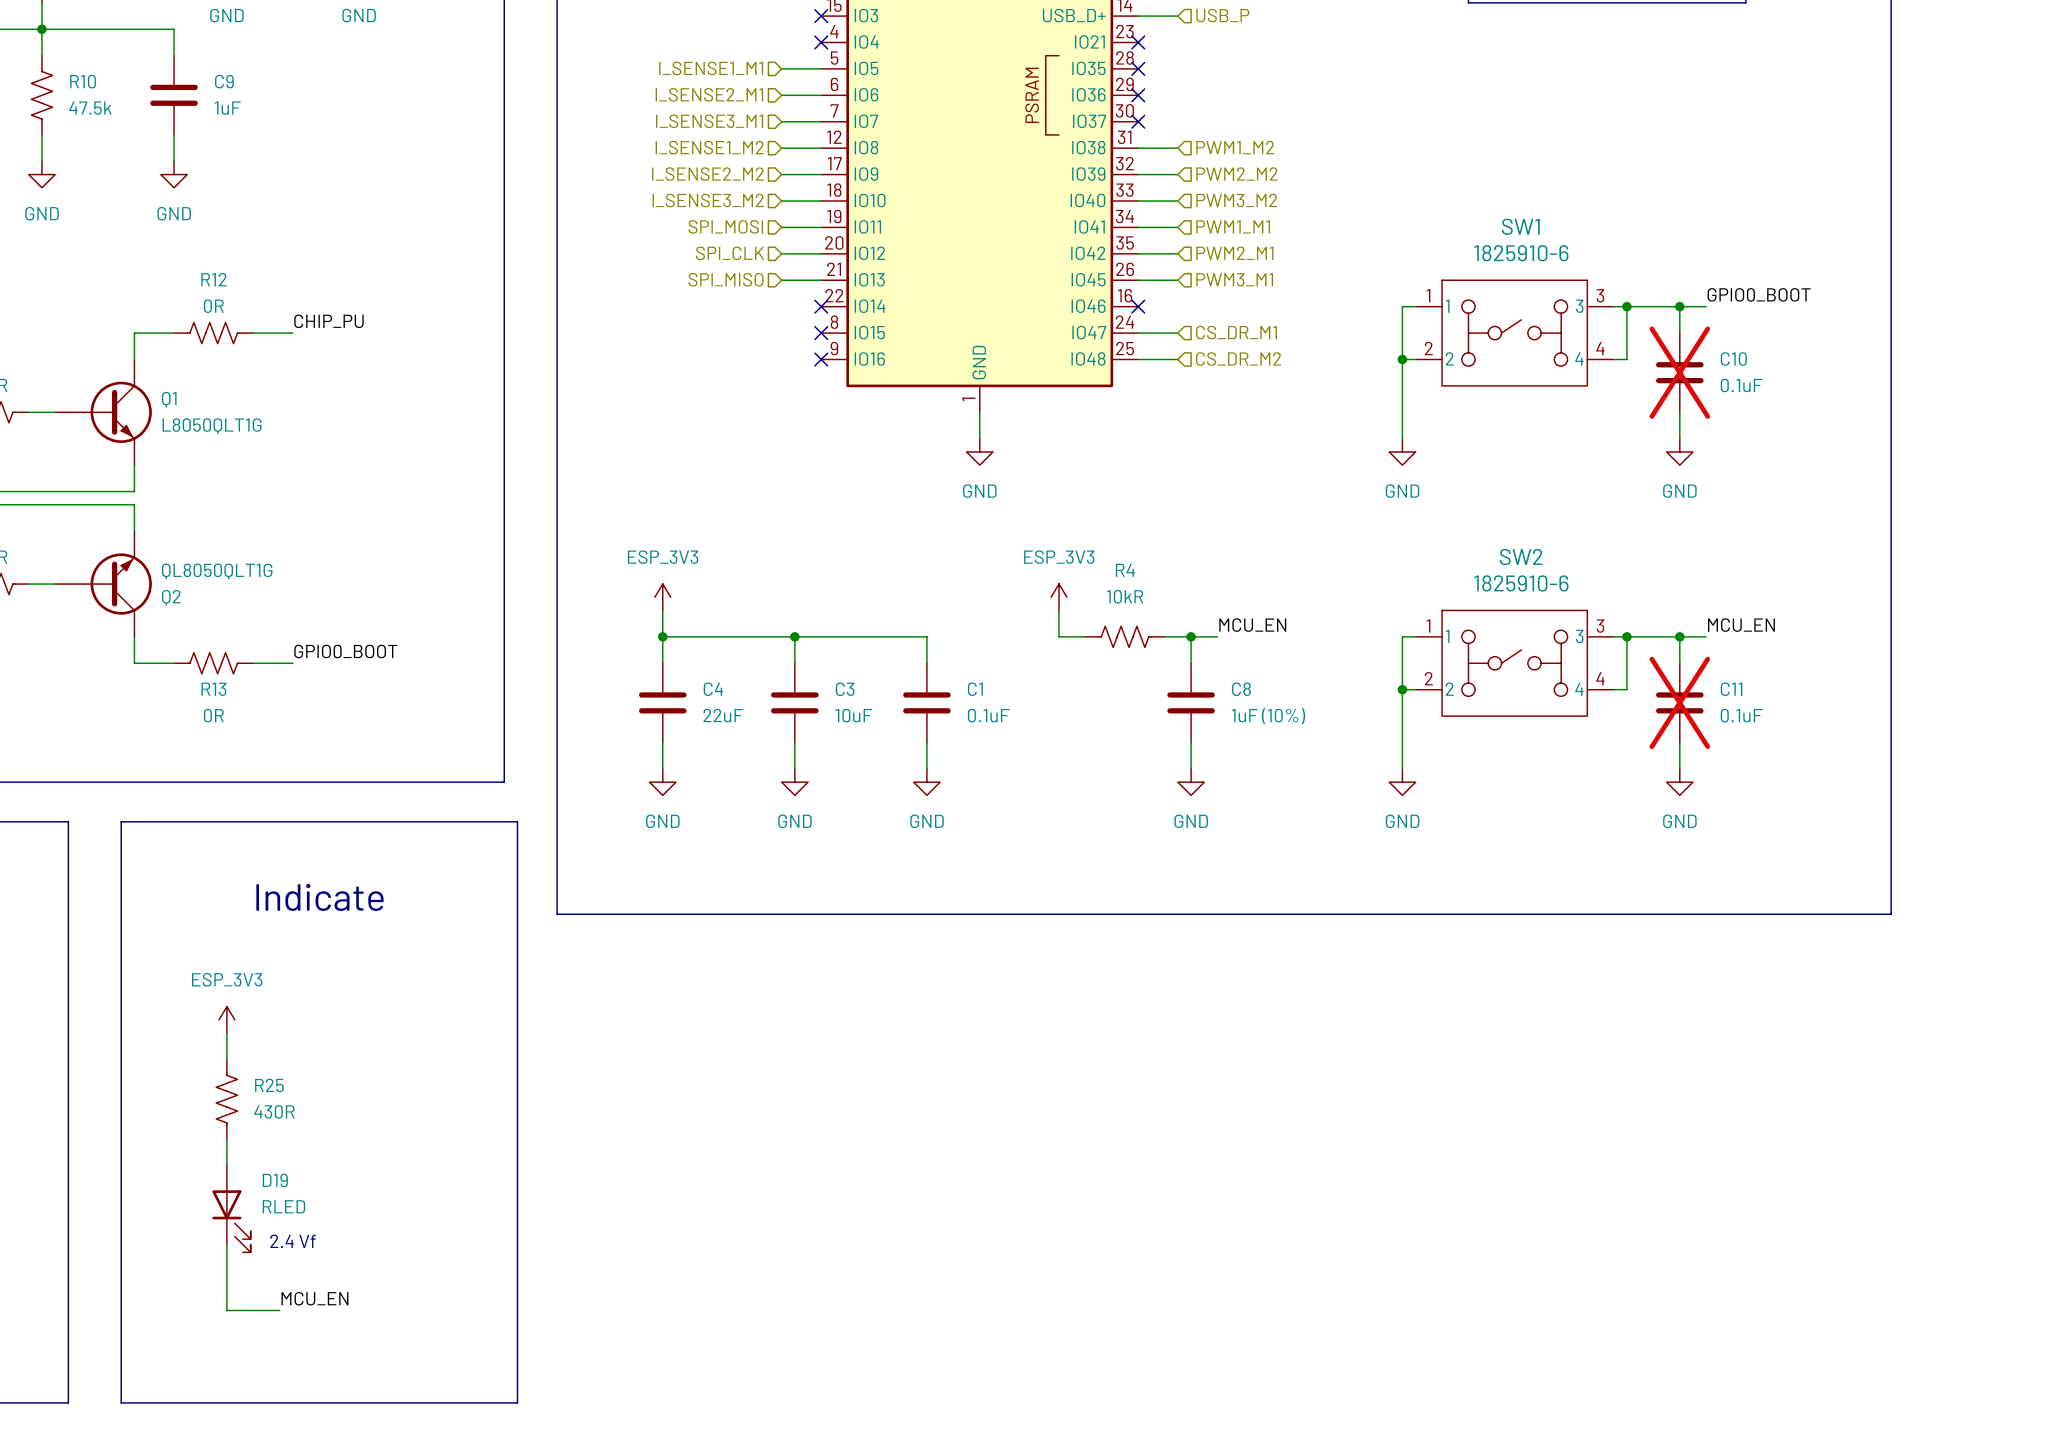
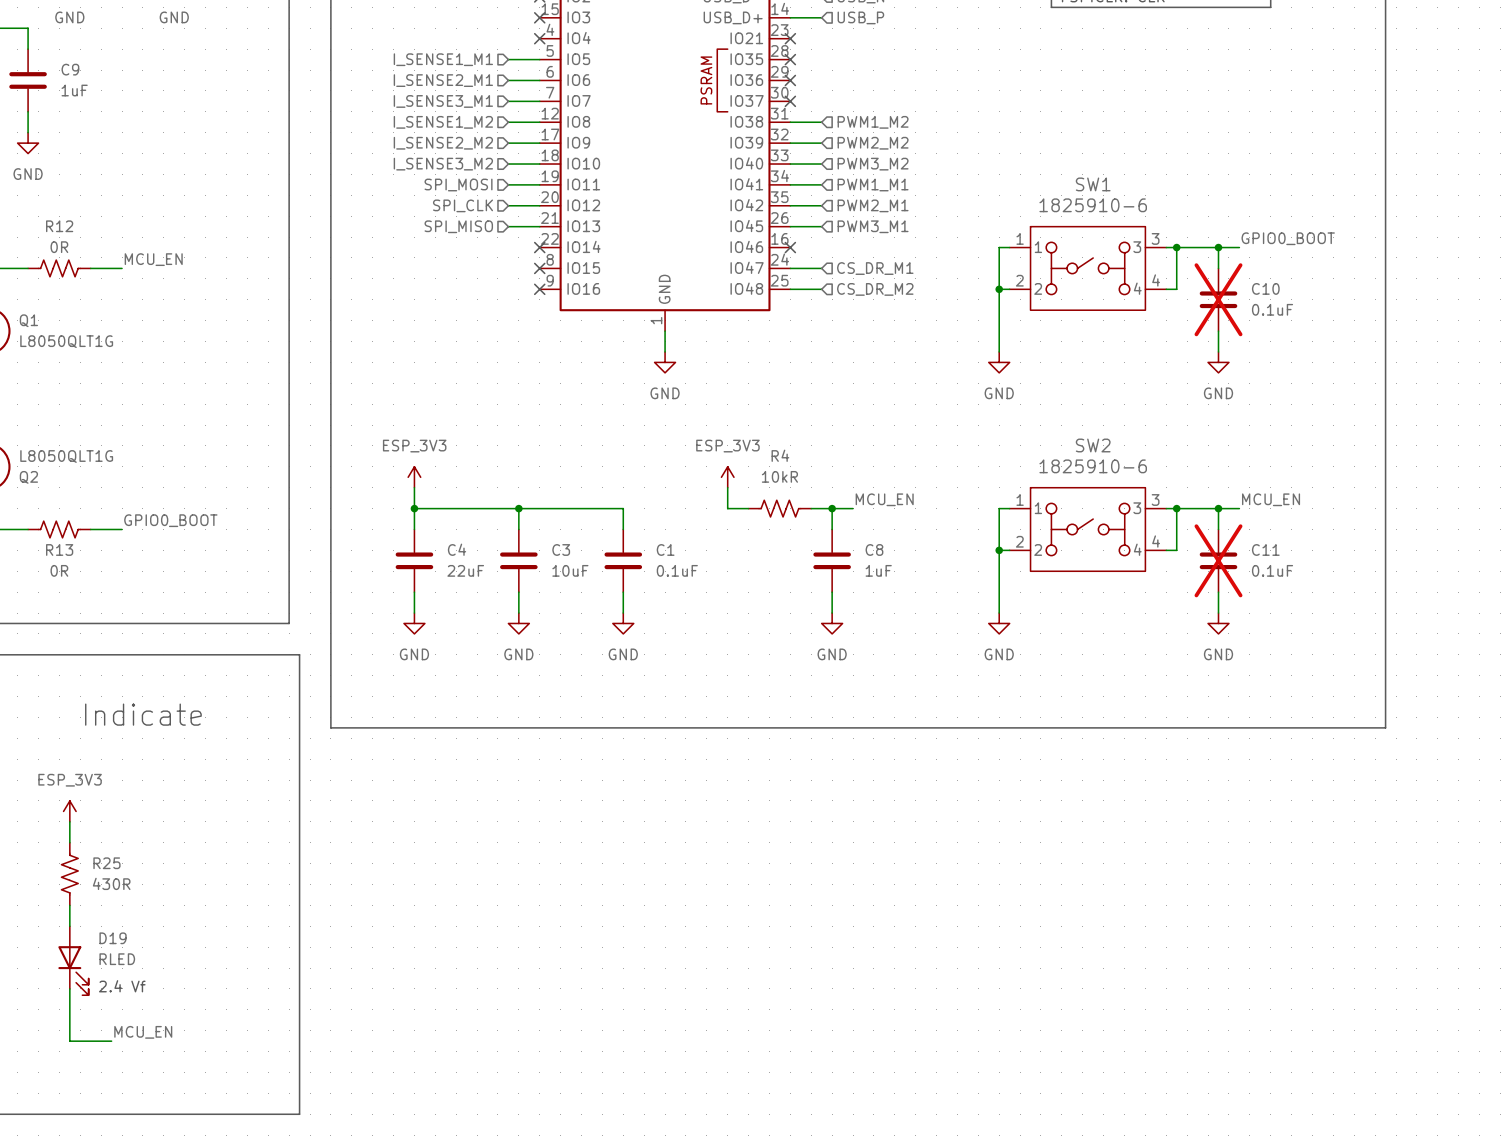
label: CHIP_PU (328, 321) -> MCU_EN (153, 259)
Q2 value: QL8050QLT1G (217, 571) -> L8050QLT1G (66, 456)
C8 value: 1uF (10%) (1268, 716) -> 1uF (878, 570)

